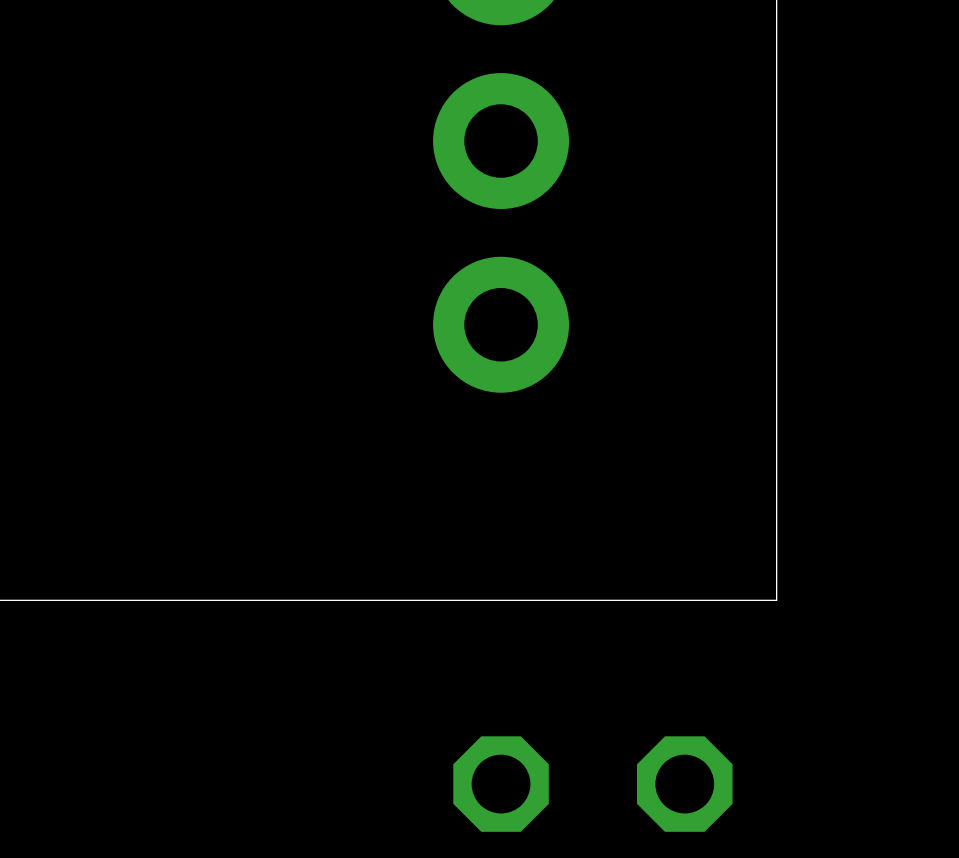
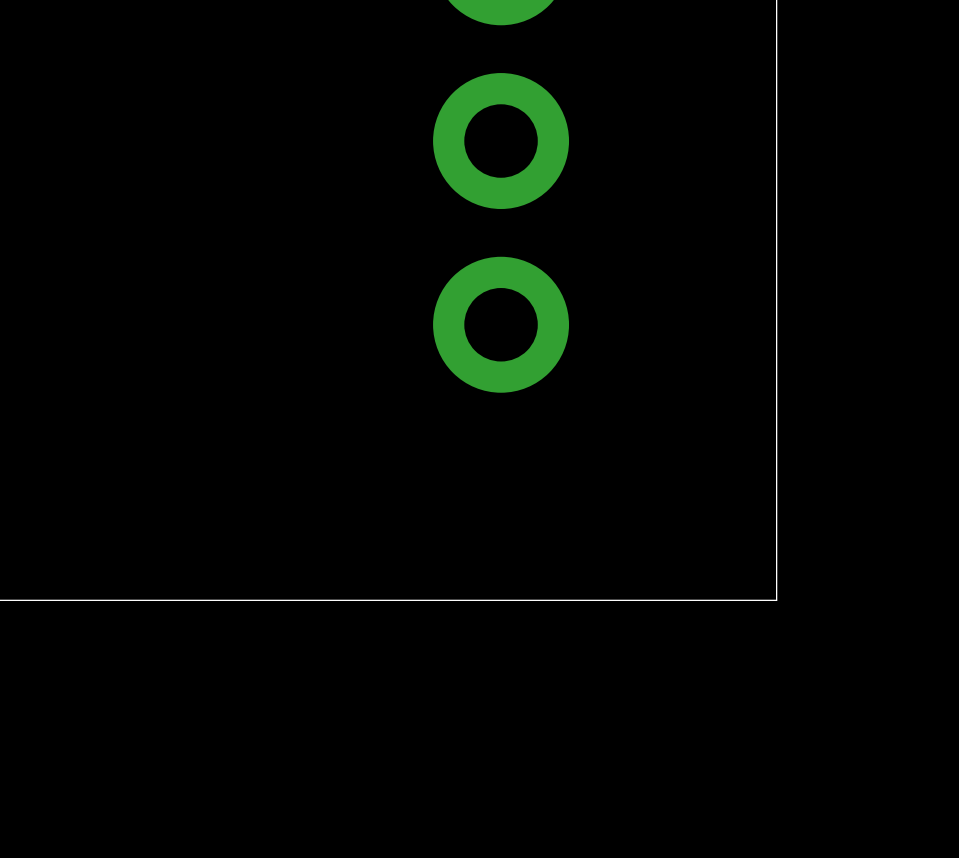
part: (592, 784) -> none

